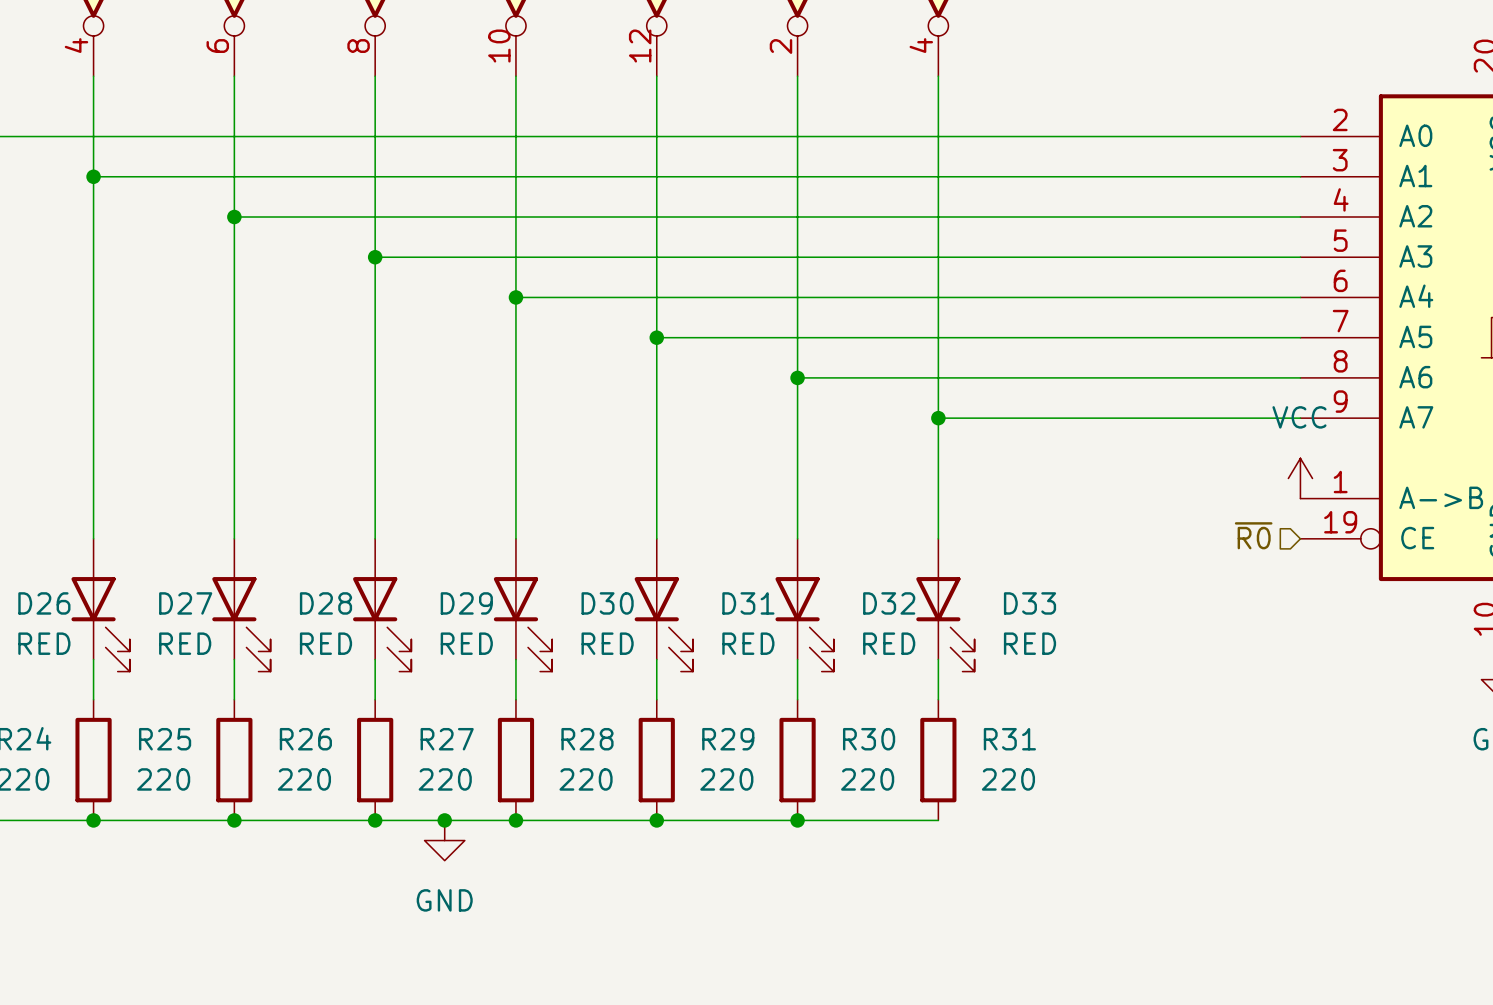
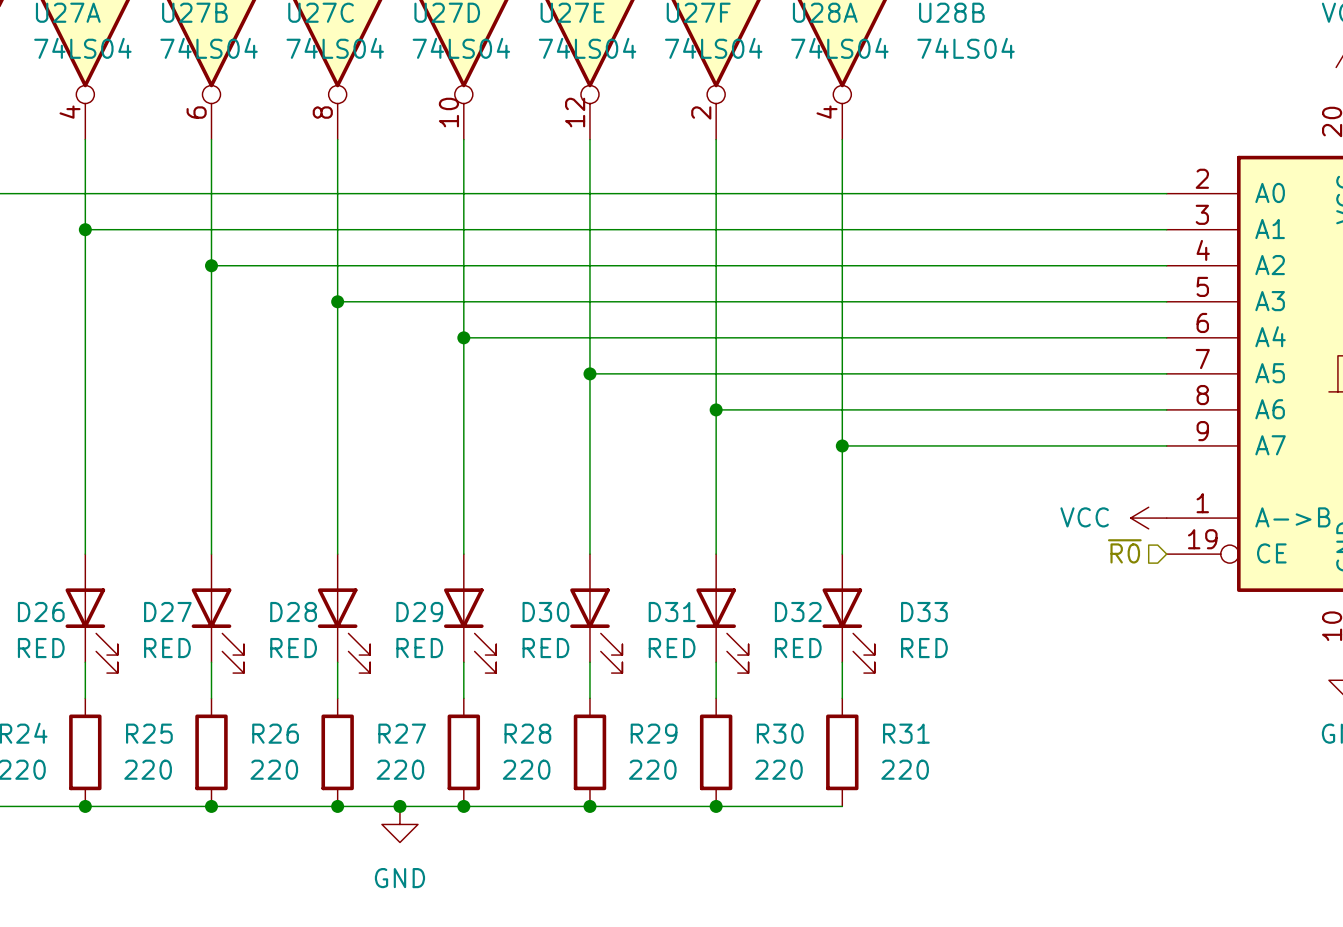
power symbol rotation: 0° (1300, 478) -> 90° counterclockwise (1148, 518)
power symbol position: VCC (1300, 478) -> VCC (1148, 518)

